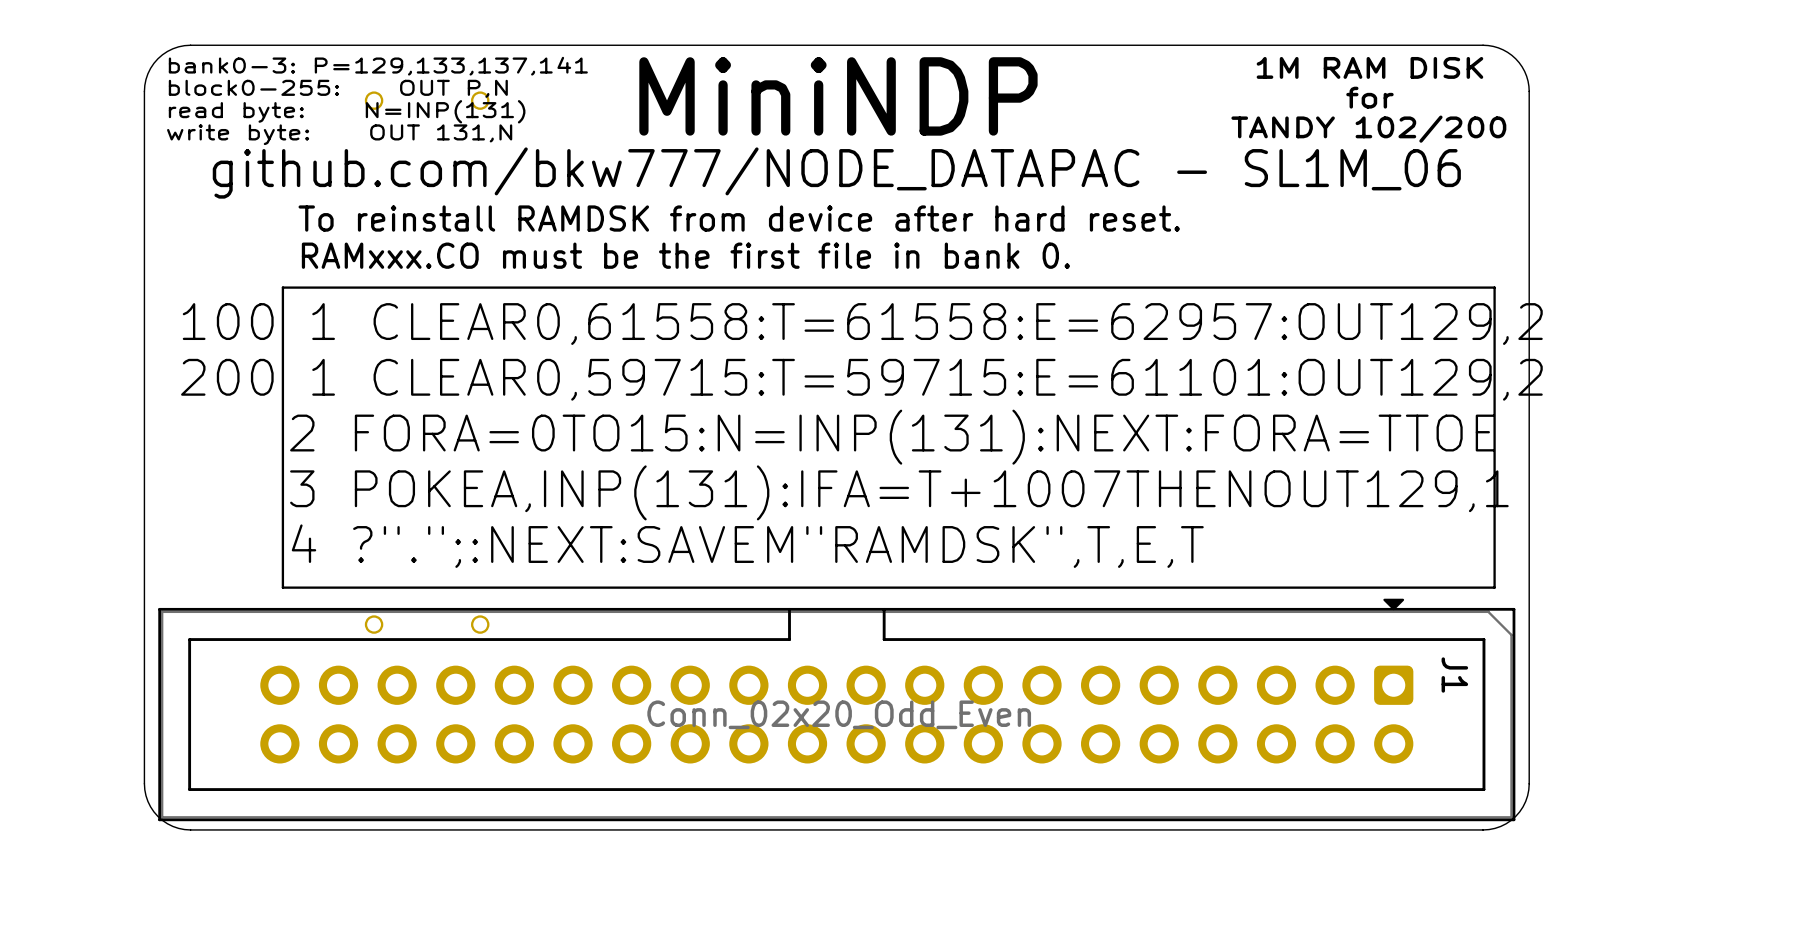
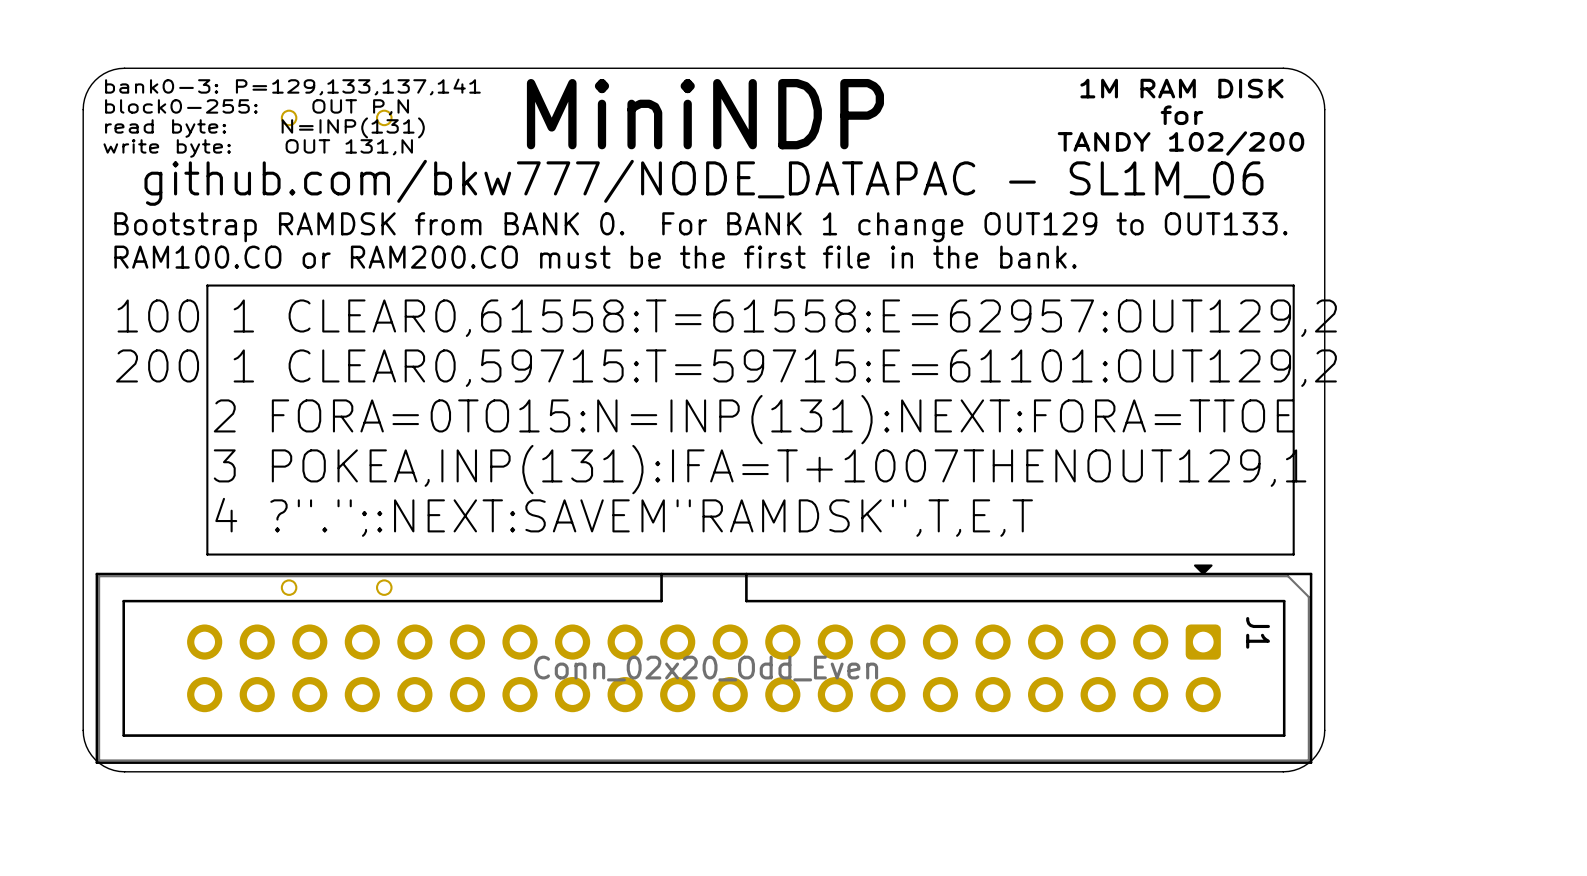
text: To reinstall RAMDSK from device after hard reset. (739, 218) -> none
text: none -> Bootstrap RAMDSK from BANK 0. For BANK 1 change OUT129 to OUT133. (700, 227)
text: RAMxxx.CO must be the first file in bank 0. (685, 255) -> RAM100.CO or RAM200.CO must be the first file in the bank. (595, 257)

